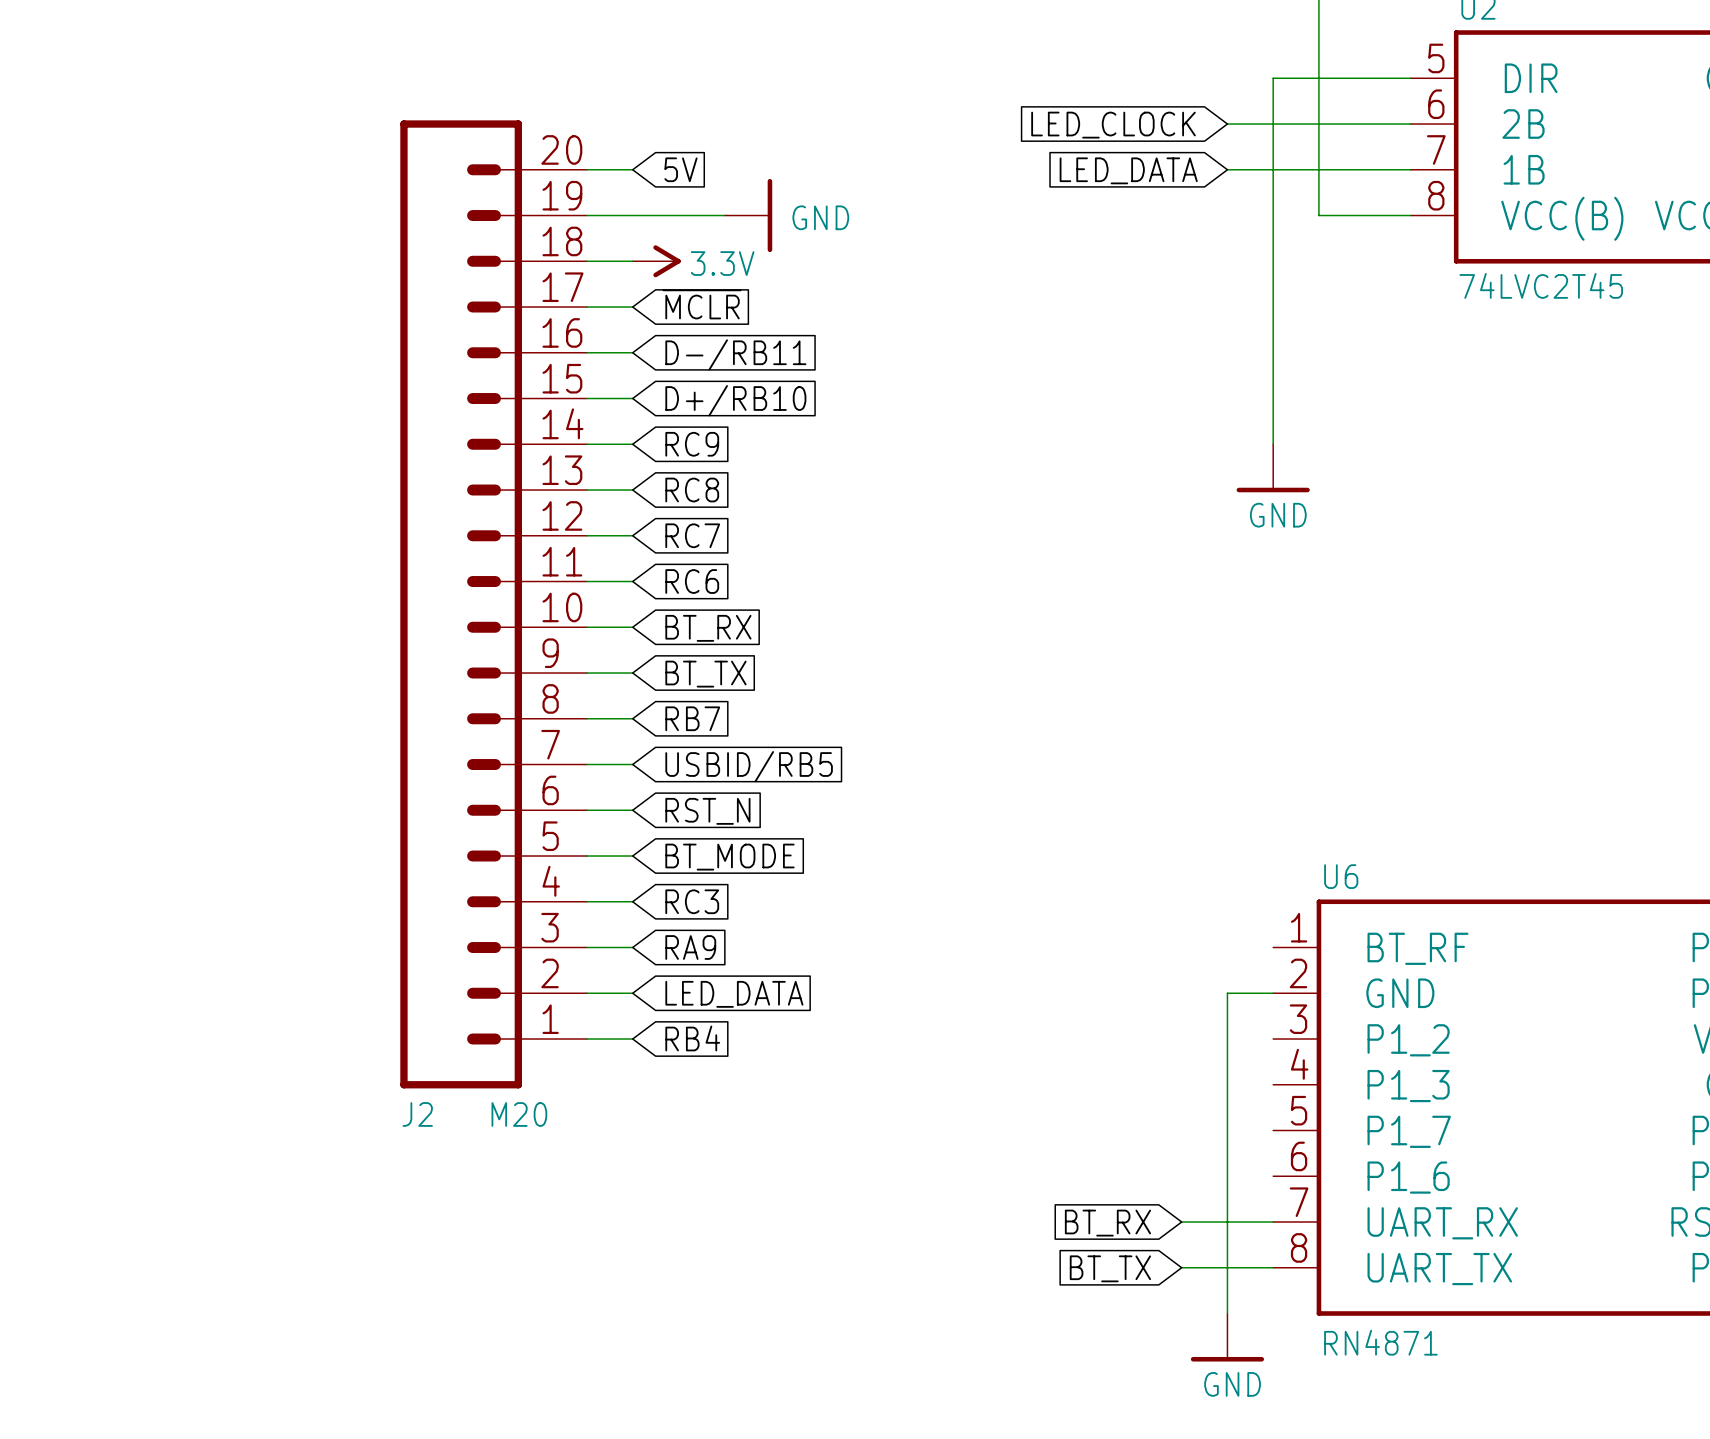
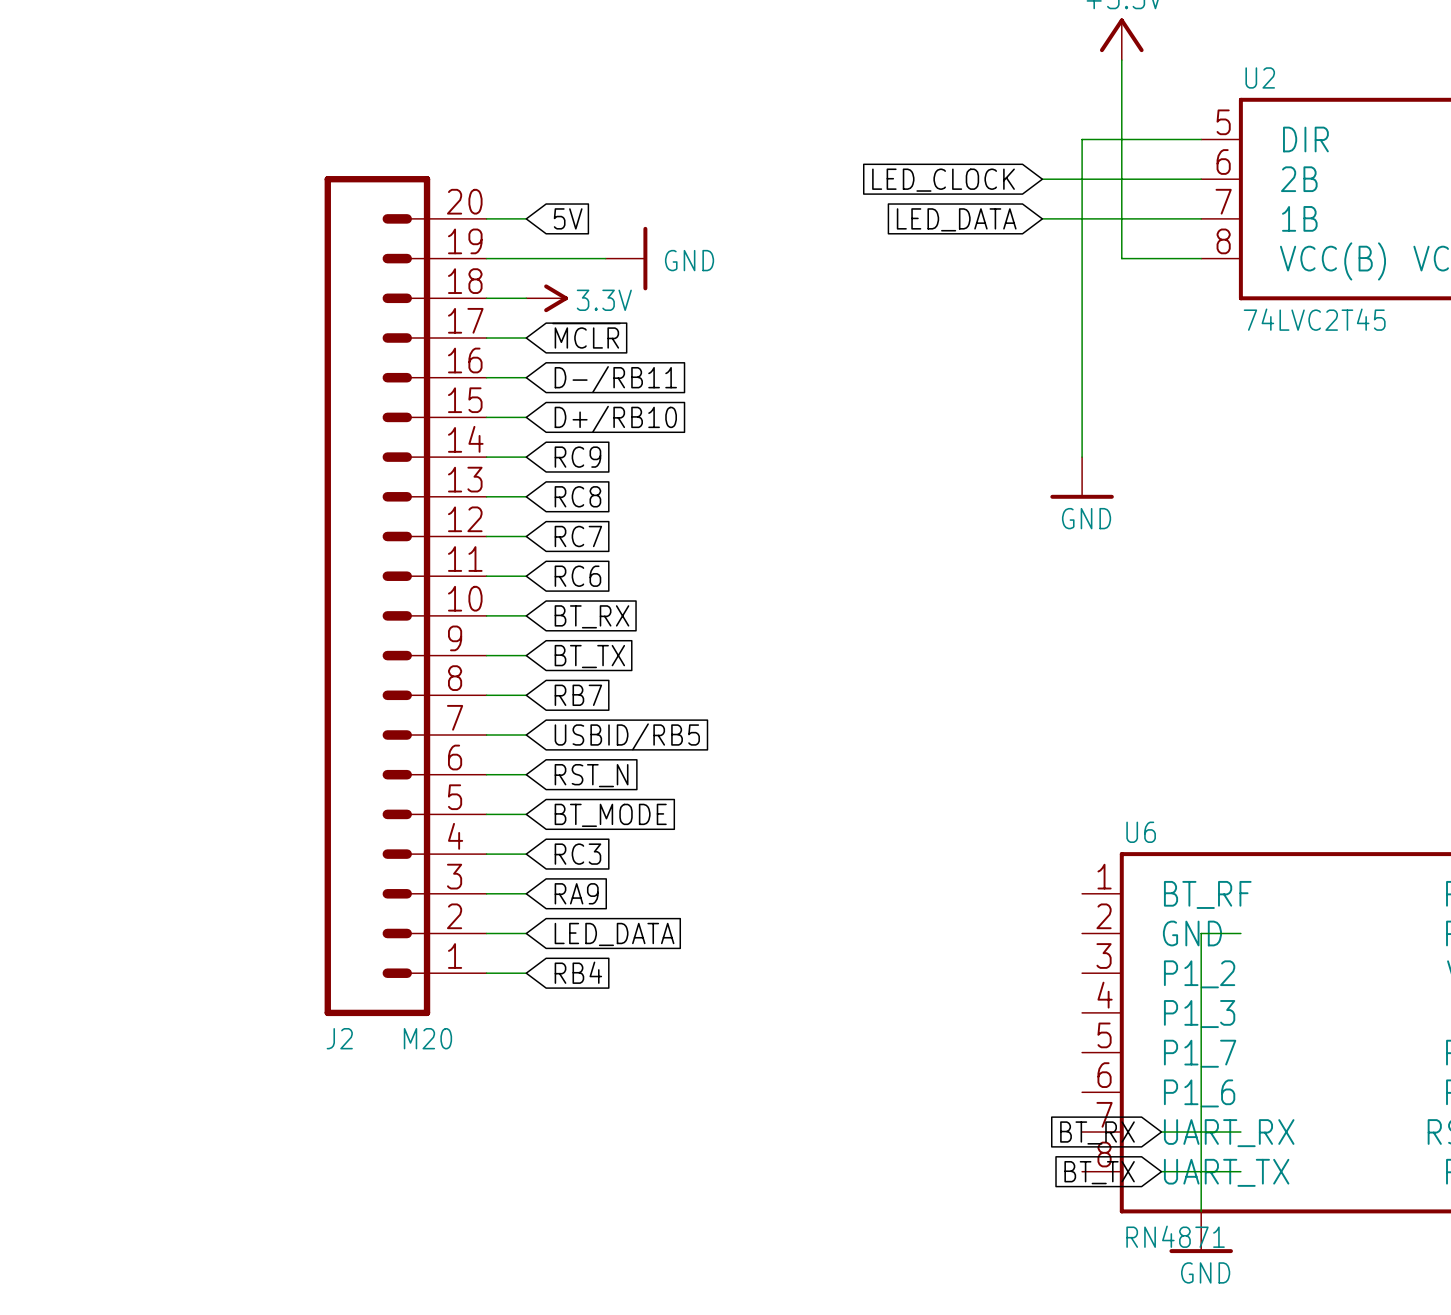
wire: (1273, 993) (1227, 993) (1227, 1313) -> (1240, 933) (1201, 933) (1201, 1211)
wire: (1181, 1222) (1273, 1222) -> (1161, 1132) (1240, 1132)
global label position: BT_RX (1107, 1223) -> BT_RX (1097, 1132)
wire: (1181, 1267) (1273, 1267) -> (1161, 1171) (1240, 1171)
global label position: BT_TX (1110, 1268) -> BT_TX (1099, 1172)
power symbol position: GND (1227, 1337) -> GND (1201, 1232)

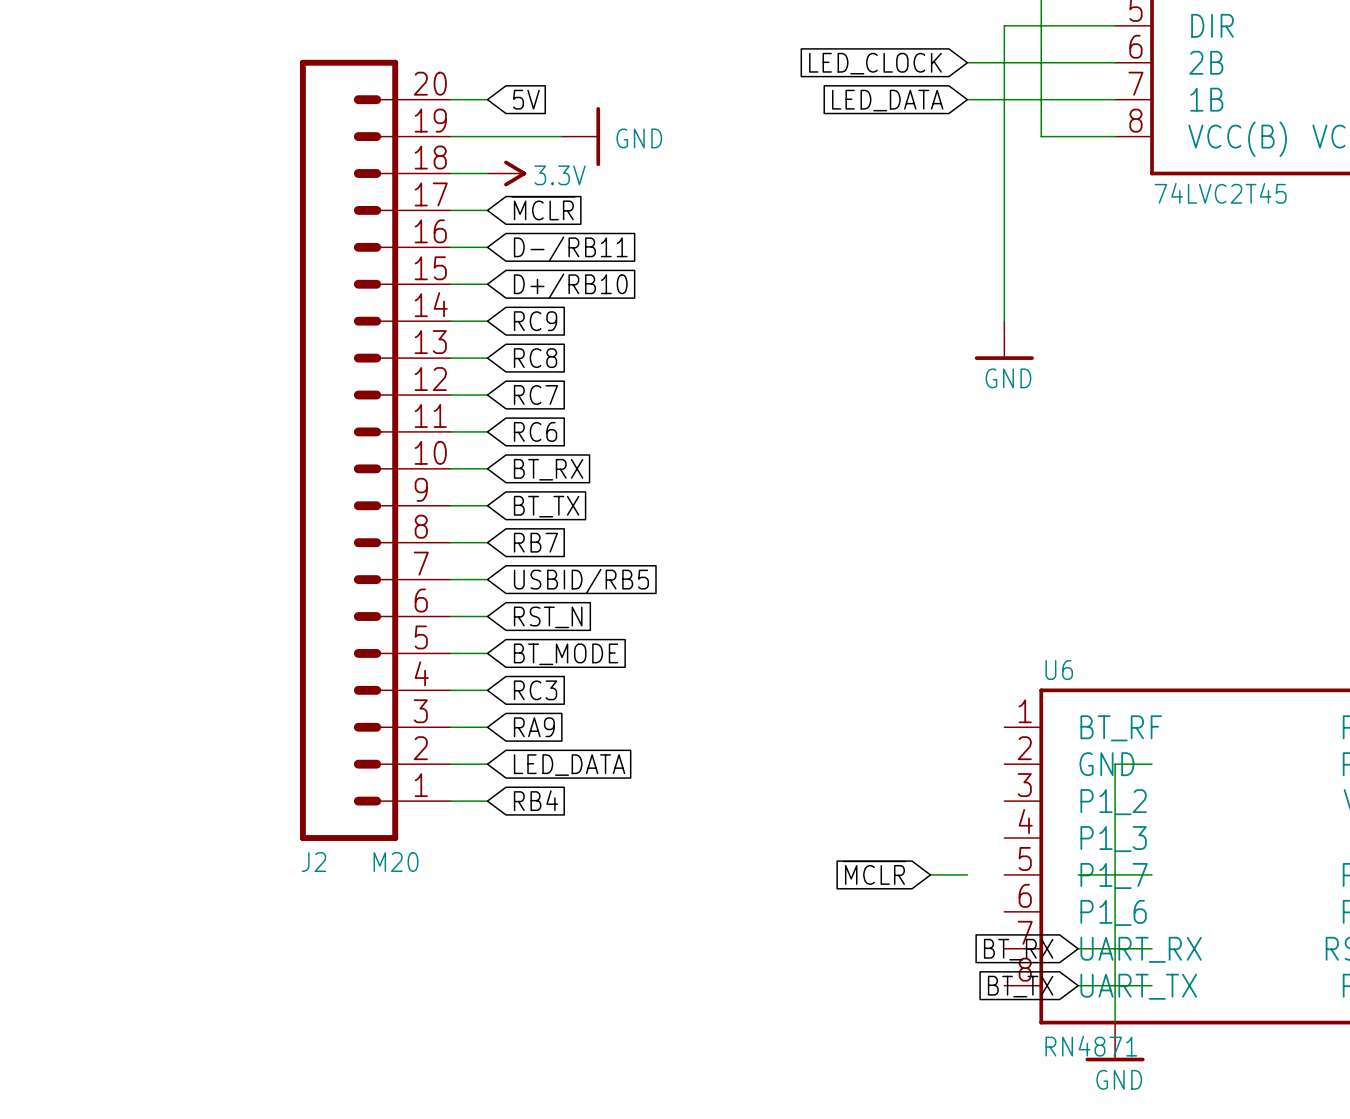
global label: none -> ~{MCLR} (874, 872)
wire: none -> (930, 874) (967, 874)
wire: none -> (1078, 874) (1152, 874)

